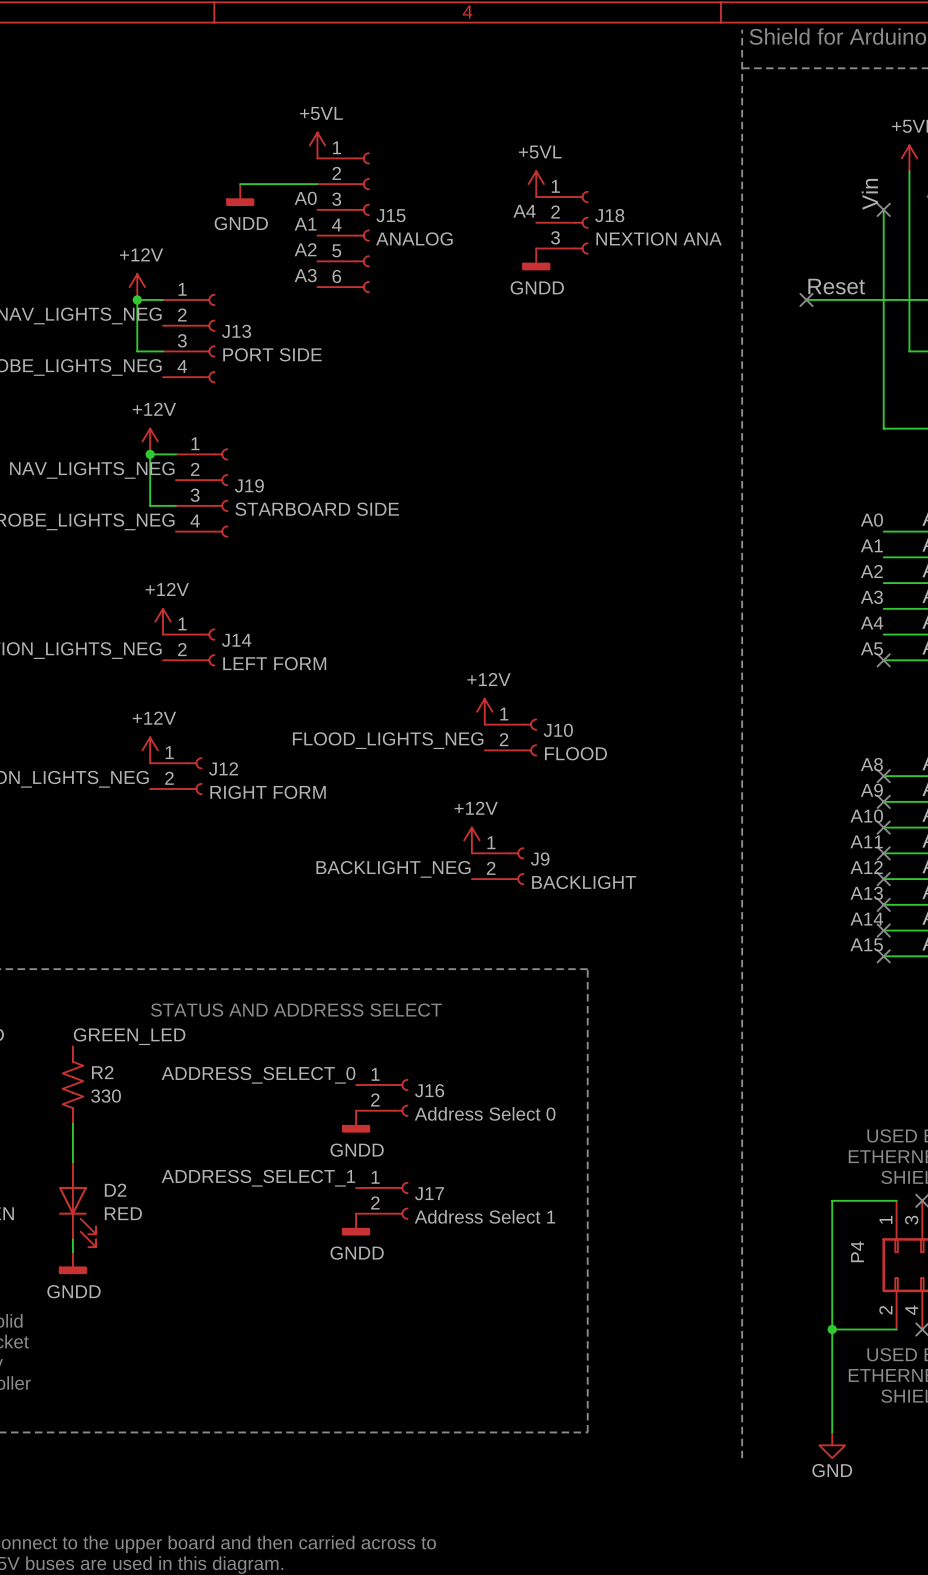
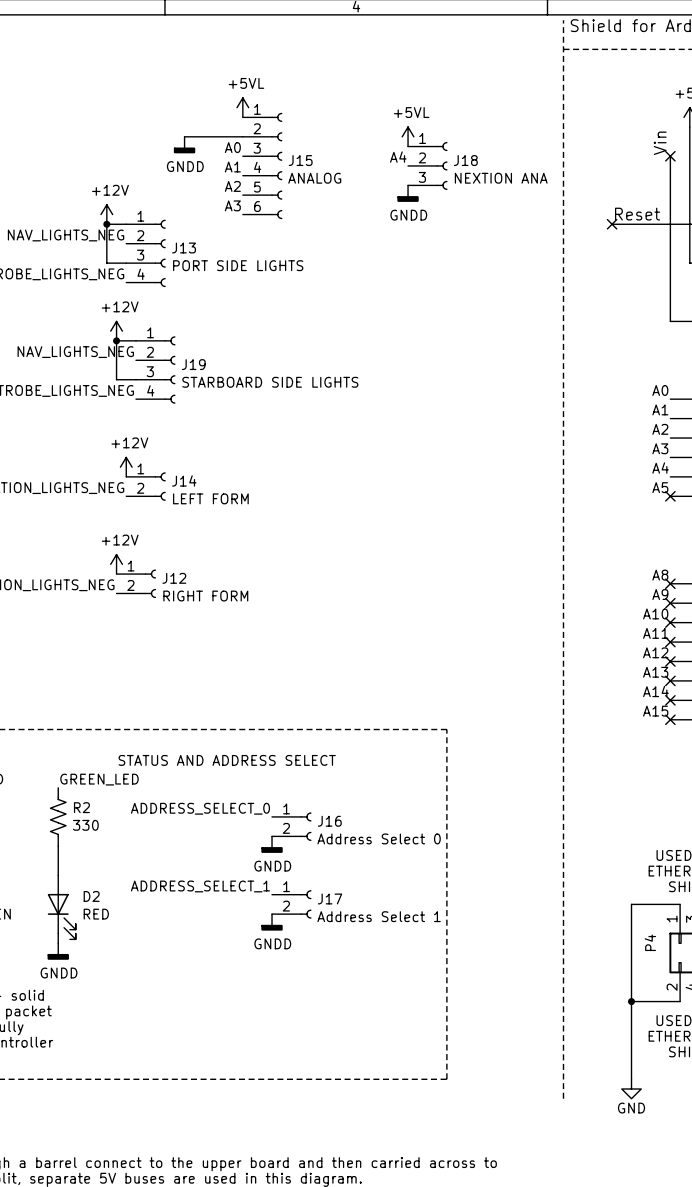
J13 value: PORT SIDE (272, 354) -> PORT SIDE LIGHTS (238, 265)
J19 value: STARBOARD SIDE (317, 509) -> STARBOARD SIDE LIGHTS (270, 382)
power symbol: +12V (484, 711) -> none
J10: FLOOD (510, 737) -> none
label: FLOOD_LIGHTS_NEG (388, 740) -> none
power symbol: +12V (471, 840) -> none
J9: BACKLIGHT (498, 866) -> none
label: BACKLIGHT_NEG (393, 869) -> none

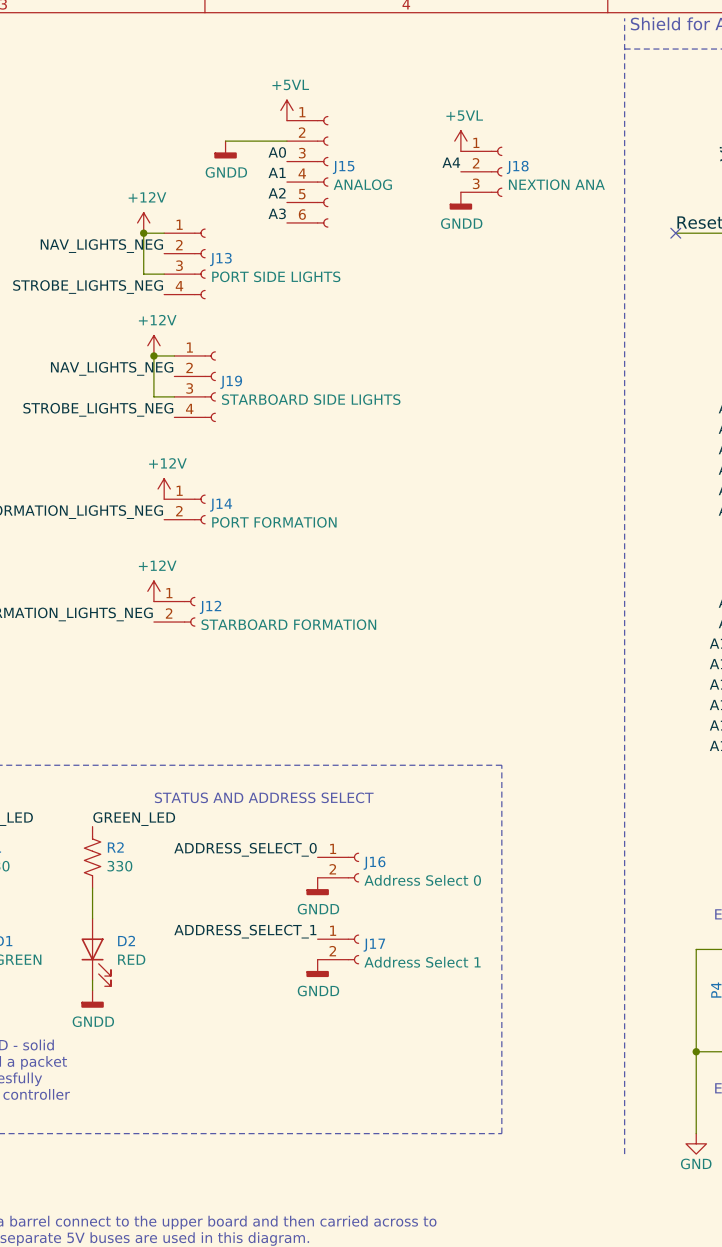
J14 value: LEFT FORM (210, 498) -> PORT FORMATION (274, 522)
J12 value: RIGHT FORM (205, 596) -> STARBOARD FORMATION (288, 624)

